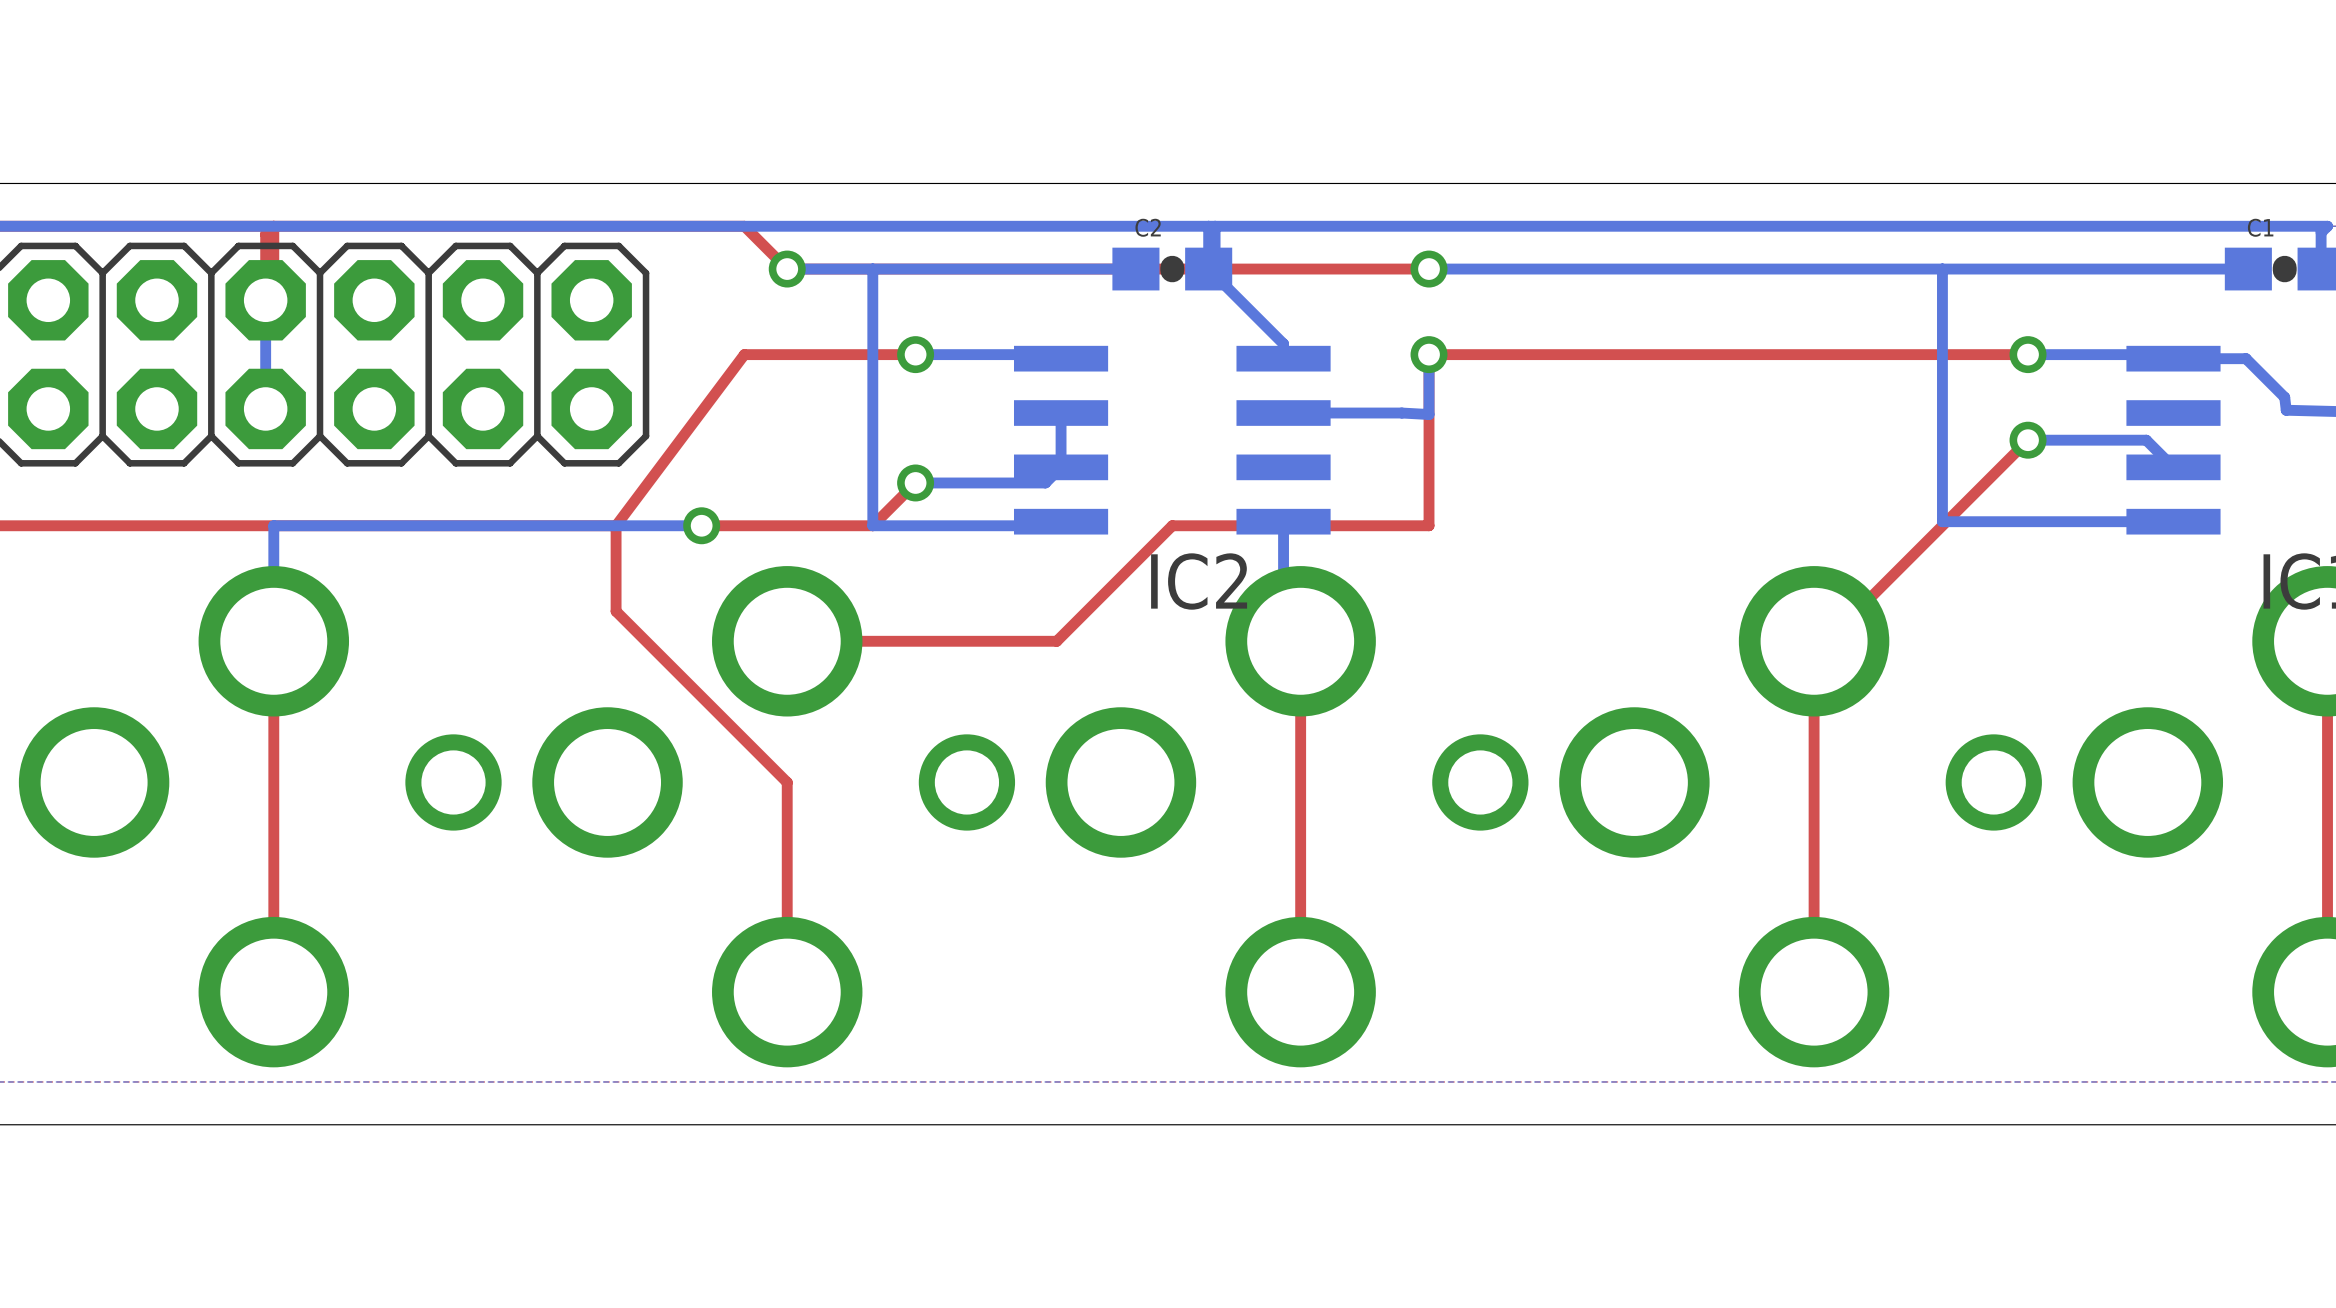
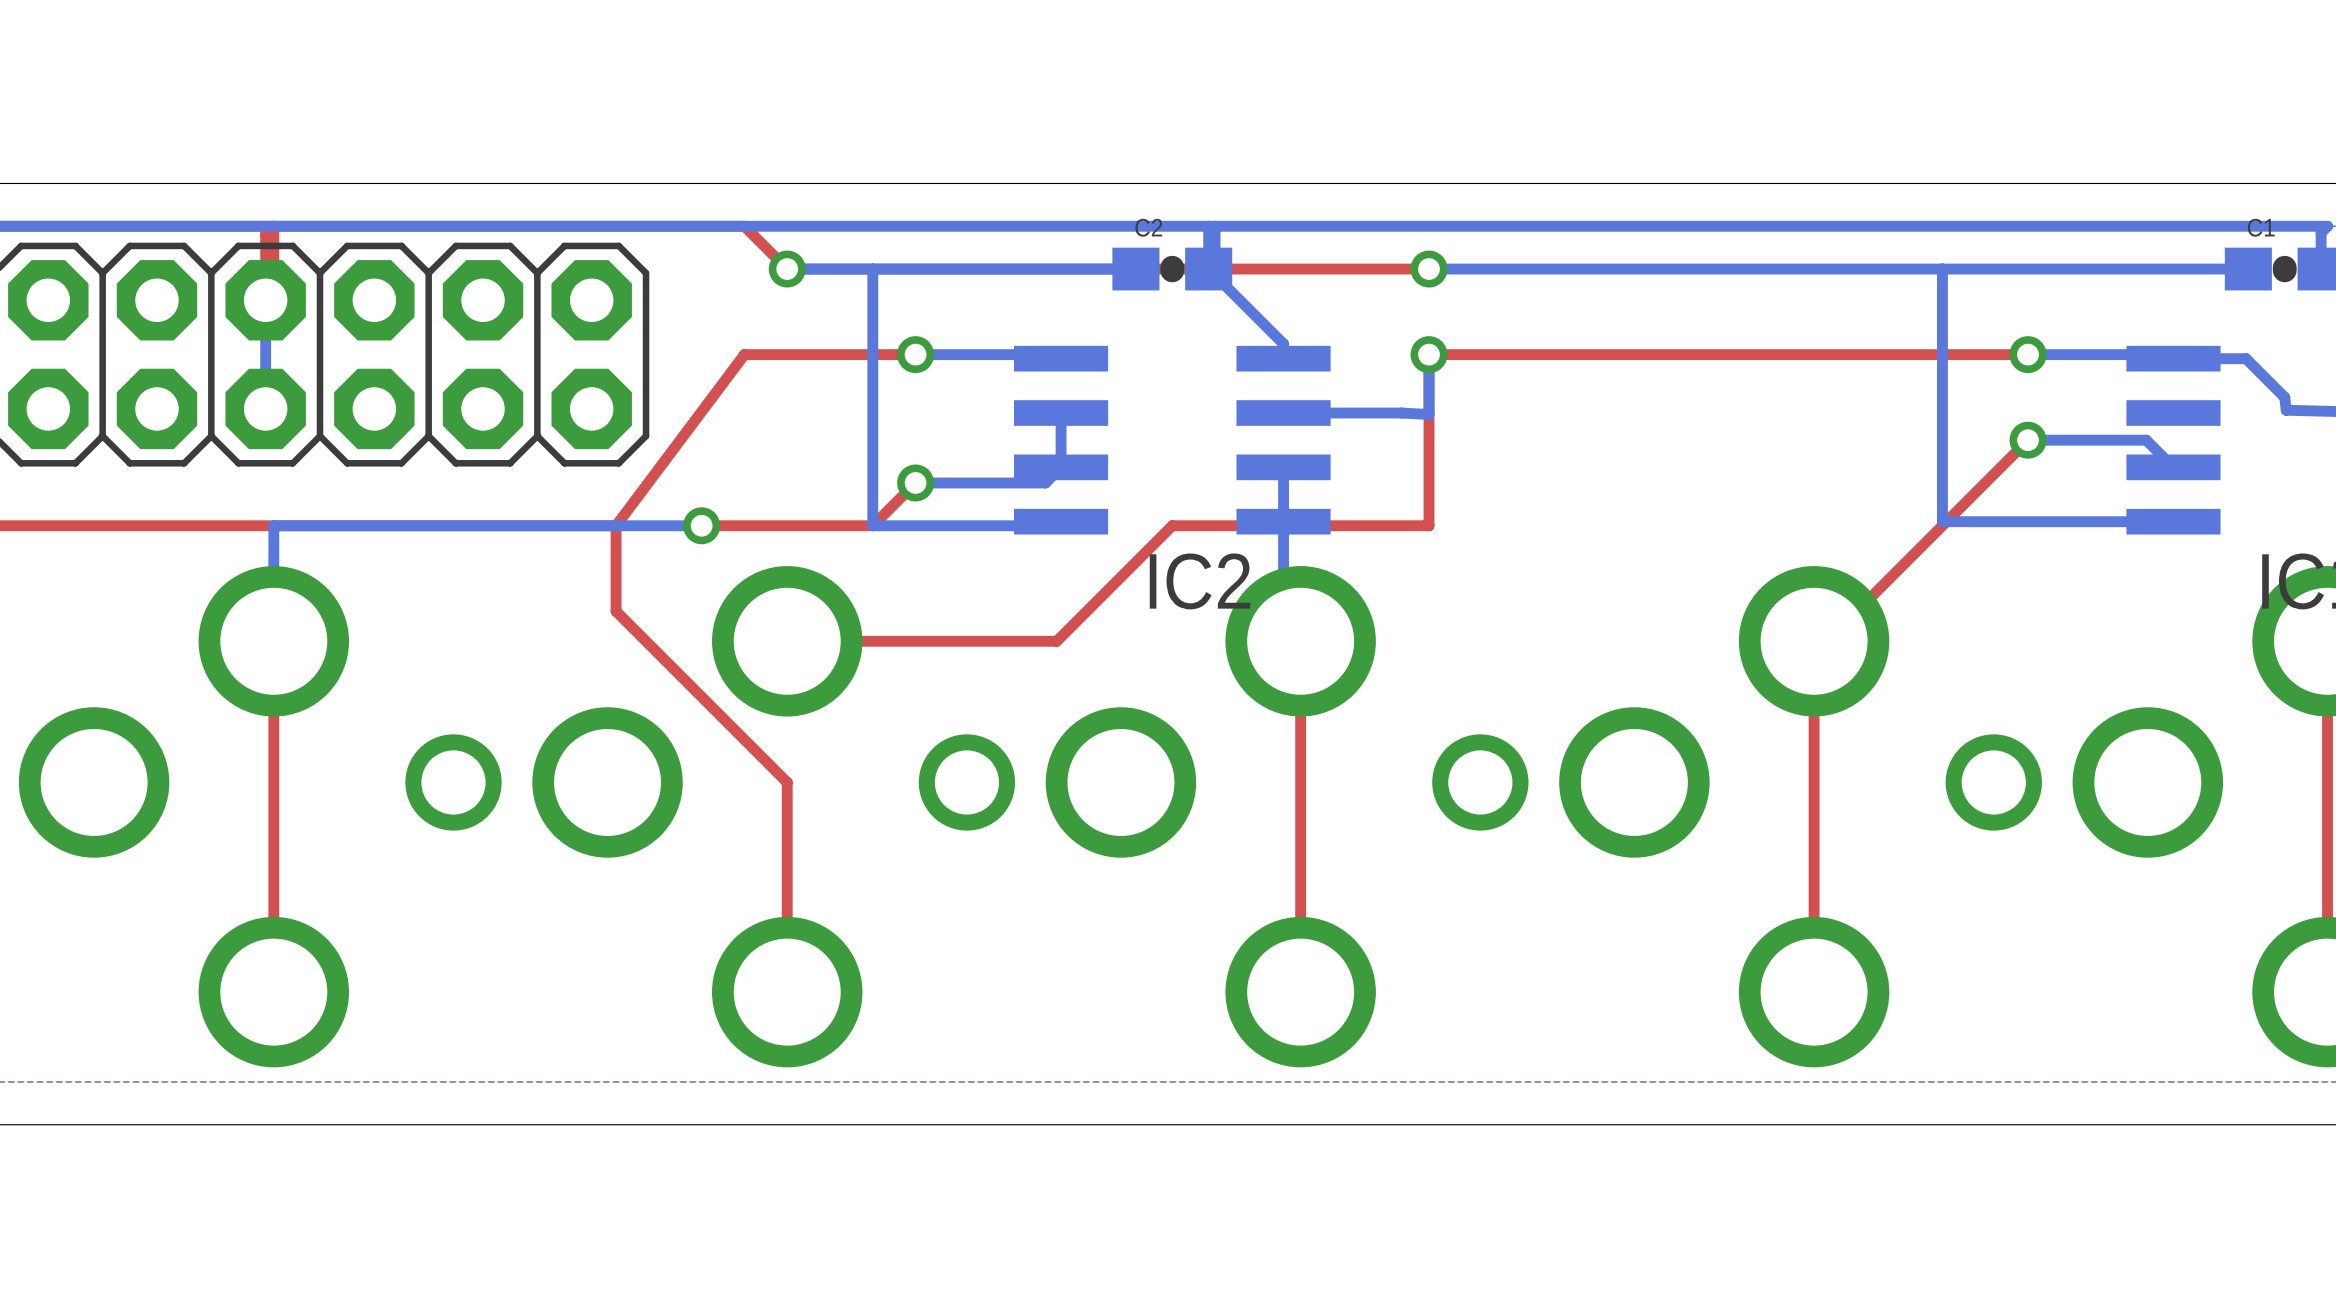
bottom track: none -> (1283, 467) (1283, 521)

